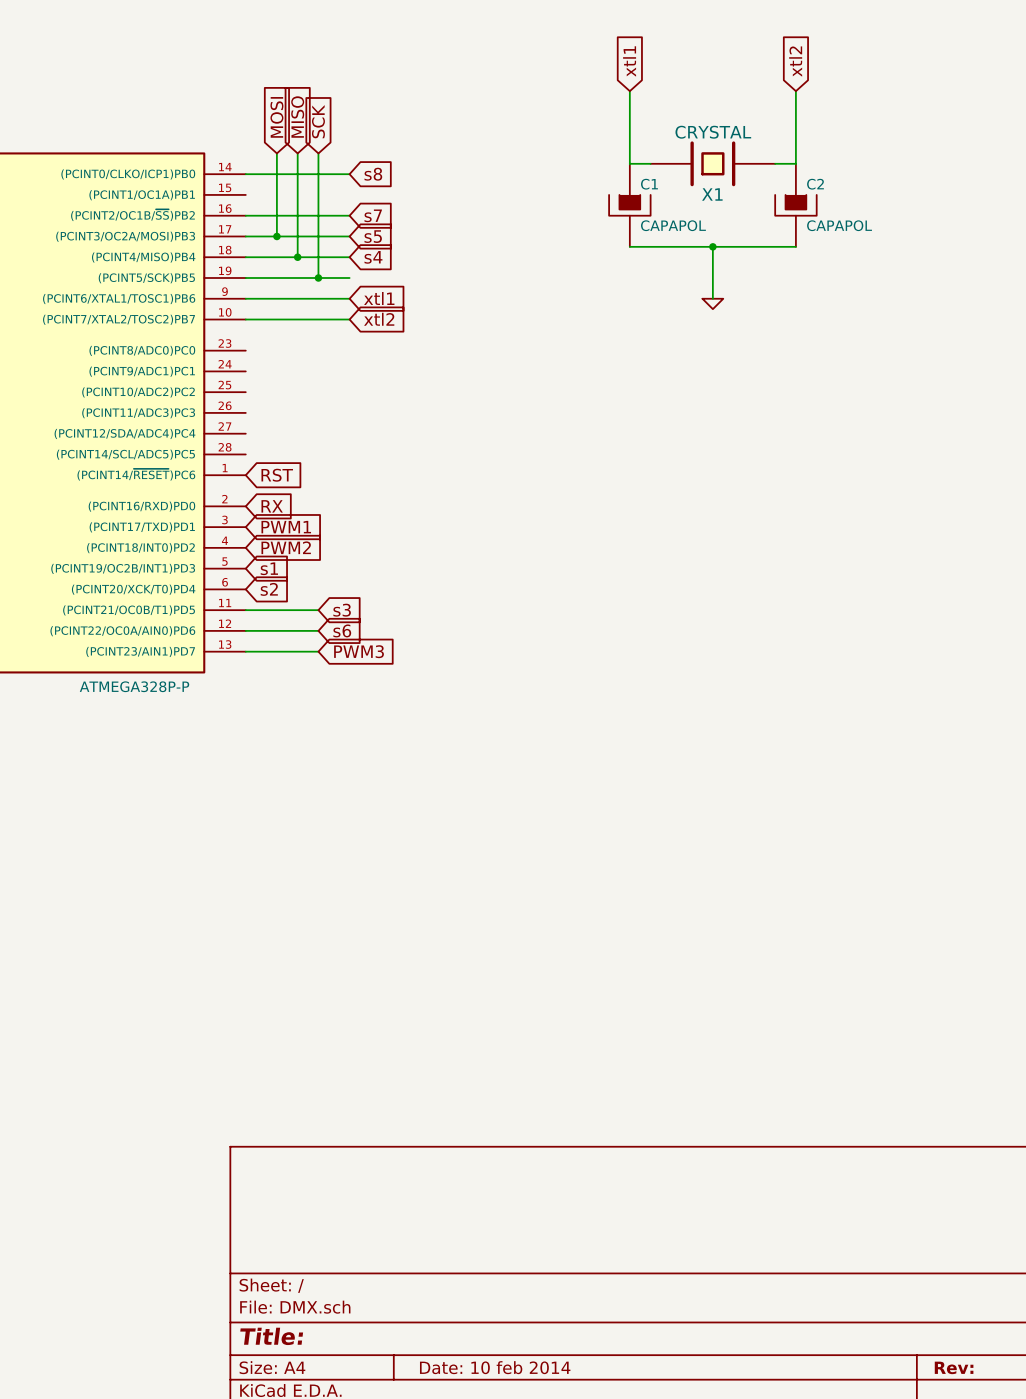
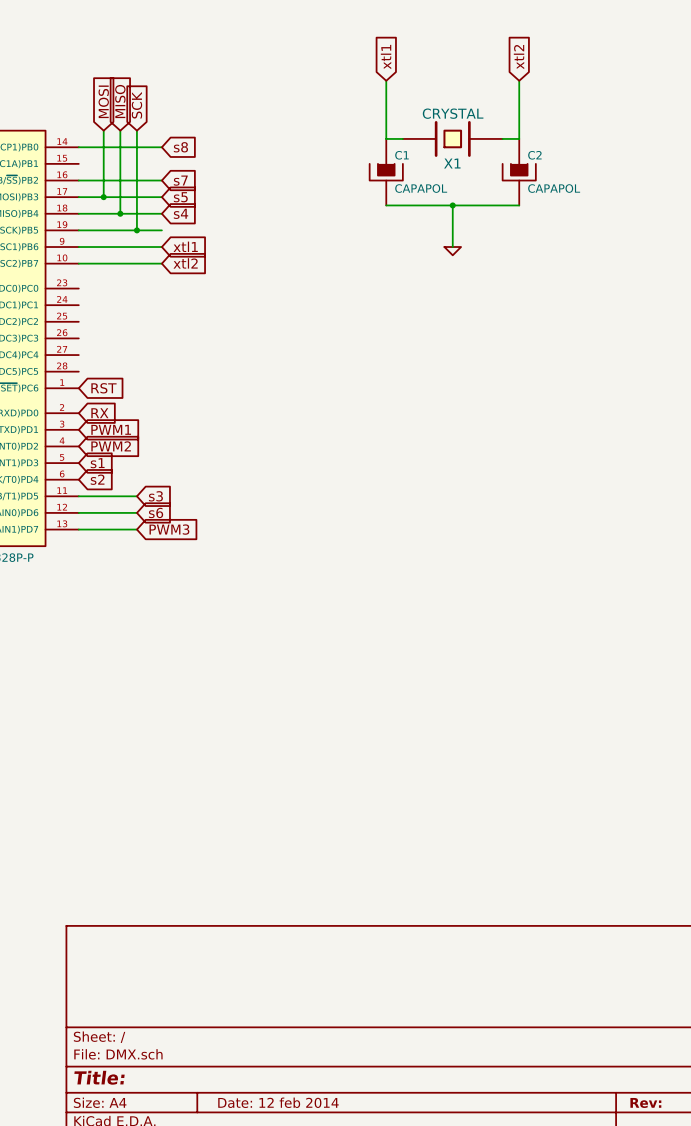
title block: Date: 10 feb 2014 (495, 1367) -> Date: 12 feb 2014 (278, 1102)

